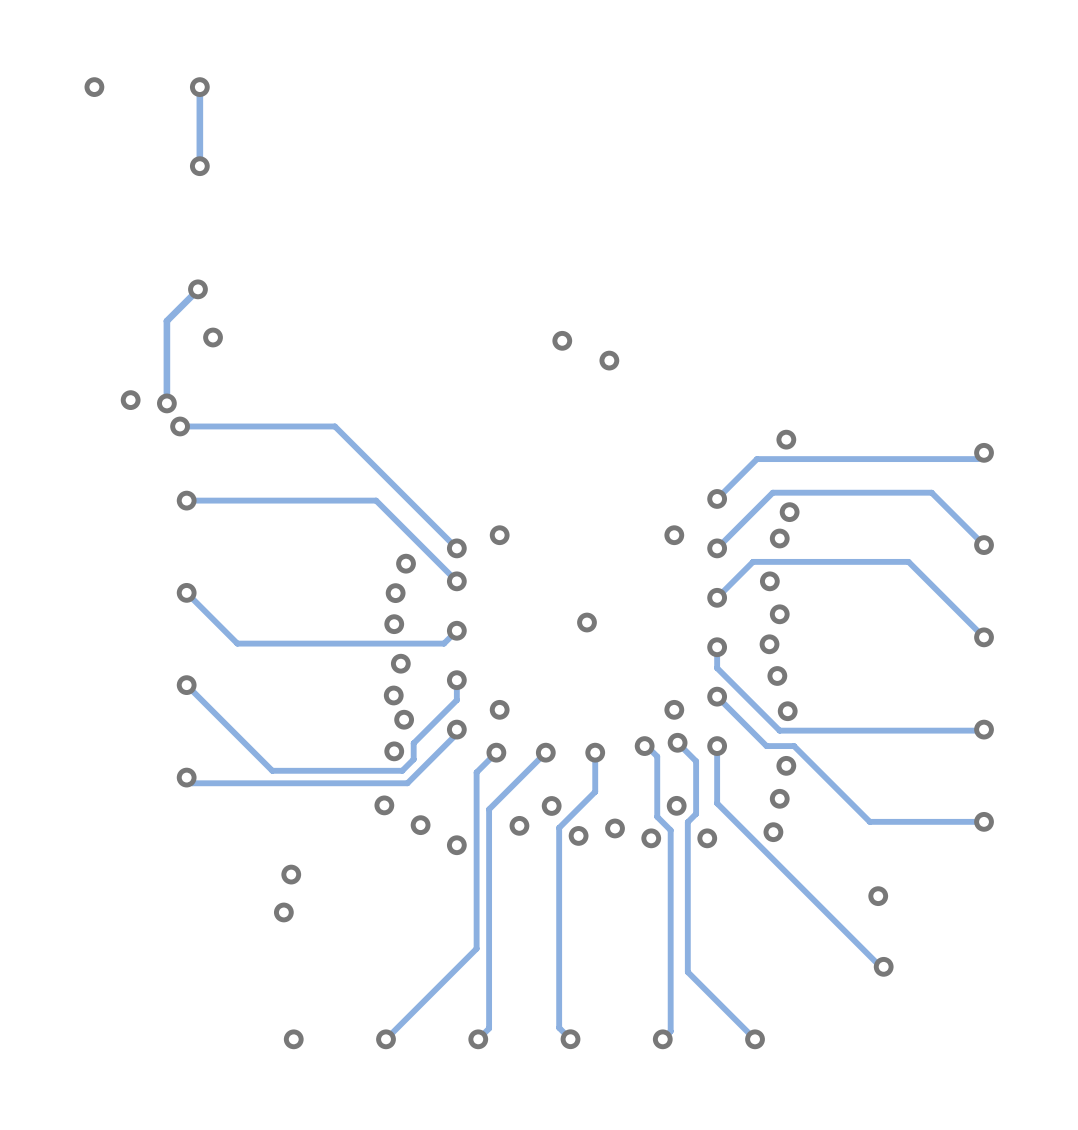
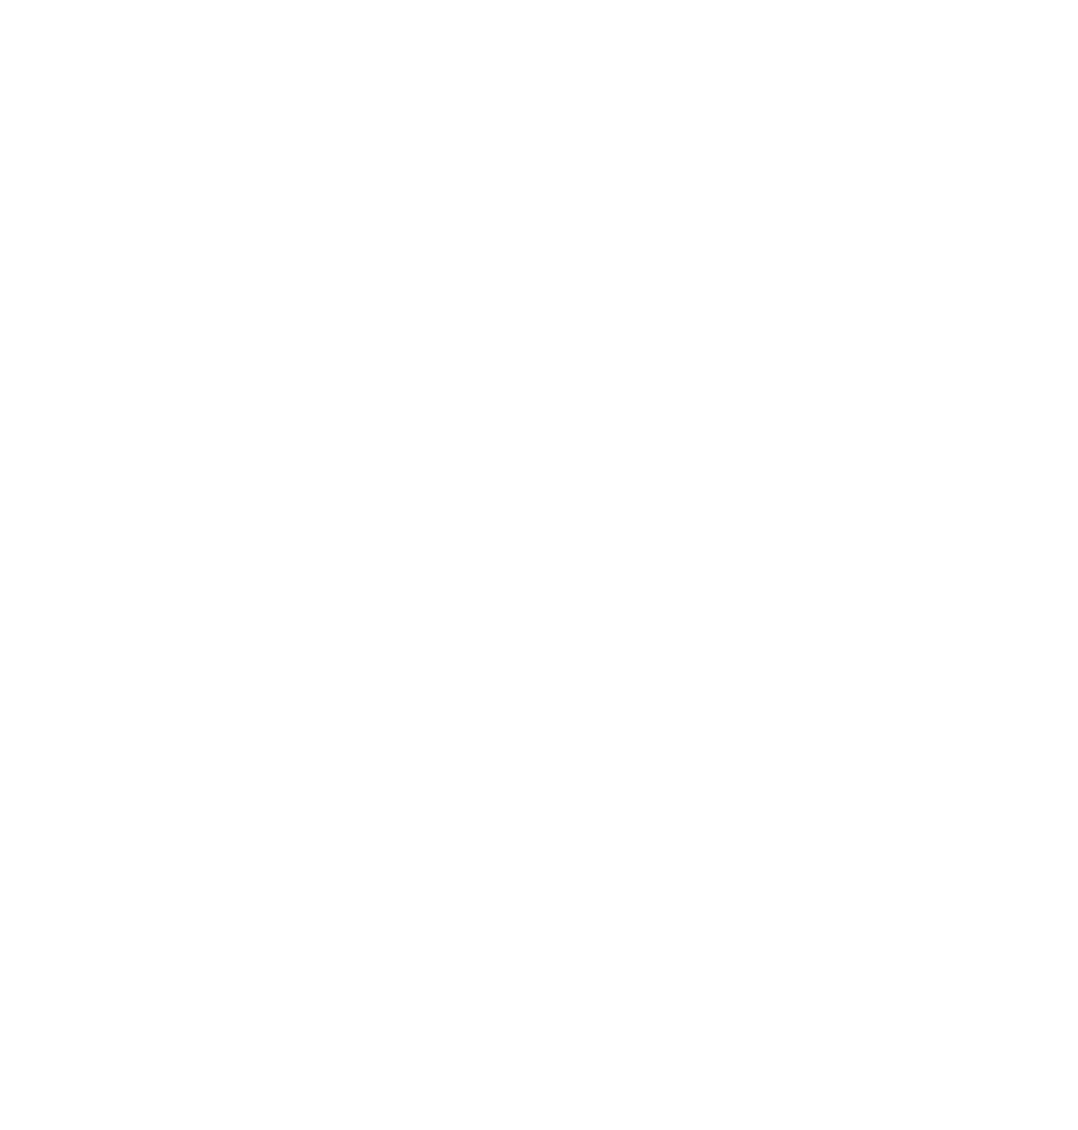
via: (94, 87) -> none
track: (199, 87) (199, 166) -> none
via: (199, 87) -> none
via: (199, 166) -> none
track: (197, 289) (166, 321) (166, 403) -> none
via: (197, 289) -> none
via: (213, 337) -> none
via: (562, 340) -> none
via: (609, 360) -> none
via: (130, 400) -> none
via: (166, 403) -> none
track: (180, 426) (334, 426) (456, 548) -> none
via: (180, 426) -> none
via: (786, 439) -> none
track: (984, 452) (977, 459) (757, 459) (717, 498) -> none
via: (984, 452) -> none
via: (717, 498) -> none
track: (186, 500) (376, 500) (456, 581) -> none
via: (186, 500) -> none
via: (789, 512) -> none
via: (499, 535) -> none
via: (674, 535) -> none
via: (779, 538) -> none
track: (984, 545) (931, 492) (772, 492) (717, 548) -> none
via: (984, 545) -> none
via: (456, 548) -> none
via: (717, 548) -> none
via: (406, 563) -> none
via: (456, 581) -> none
via: (769, 581) -> none
track: (186, 592) (237, 643) (443, 643) (456, 630) -> none
via: (186, 592) -> none
via: (395, 593) -> none
track: (717, 597) (753, 561) (908, 561) (984, 637) -> none
via: (717, 597) -> none
via: (779, 614) -> none
via: (586, 622) -> none
via: (394, 624) -> none
via: (456, 630) -> none
via: (984, 637) -> none
via: (769, 644) -> none
track: (717, 647) (717, 668) (779, 730) (984, 729) -> none
via: (717, 647) -> none
via: (400, 663) -> none
via: (777, 675) -> none
track: (456, 680) (456, 700) (413, 743) (413, 759) (402, 770) (272, 770) (186, 685) -> none
via: (456, 680) -> none
via: (186, 685) -> none
via: (393, 695) -> none
track: (717, 696) (766, 746) (794, 746) (869, 821) (984, 821) -> none
via: (717, 696) -> none
via: (499, 709) -> none
via: (674, 709) -> none
via: (787, 711) -> none
via: (404, 719) -> none
track: (456, 729) (456, 733) (407, 783) (192, 783) (186, 777) -> none
via: (456, 729) -> none
via: (984, 729) -> none
track: (677, 742) (696, 761) (696, 813) (687, 822) (687, 972) (755, 1039) -> none
via: (677, 742) -> none
track: (644, 746) (657, 756) (657, 816) (670, 830) (670, 1031) (662, 1039) -> none
via: (644, 746) -> none
track: (717, 746) (717, 803) (880, 966) (883, 966) -> none
via: (717, 746) -> none
via: (394, 751) -> none
track: (496, 752) (476, 772) (476, 948) (386, 1039) -> none
via: (496, 752) -> none
track: (545, 752) (489, 809) (489, 1028) (478, 1039) -> none
via: (545, 752) -> none
track: (595, 752) (595, 791) (559, 827) (559, 1027) (570, 1039) -> none
via: (595, 752) -> none
via: (786, 765) -> none
via: (186, 777) -> none
via: (779, 798) -> none
via: (384, 805) -> none
via: (551, 805) -> none
via: (676, 805) -> none
via: (984, 821) -> none
via: (420, 825) -> none
via: (519, 825) -> none
via: (615, 828) -> none
via: (773, 832) -> none
via: (578, 835) -> none
via: (651, 838) -> none
via: (707, 838) -> none
via: (456, 845) -> none
via: (291, 874) -> none
via: (878, 896) -> none
via: (283, 912) -> none
via: (883, 966) -> none
via: (293, 1039) -> none
via: (386, 1039) -> none
via: (478, 1039) -> none
via: (570, 1039) -> none
via: (662, 1039) -> none
via: (755, 1039) -> none

